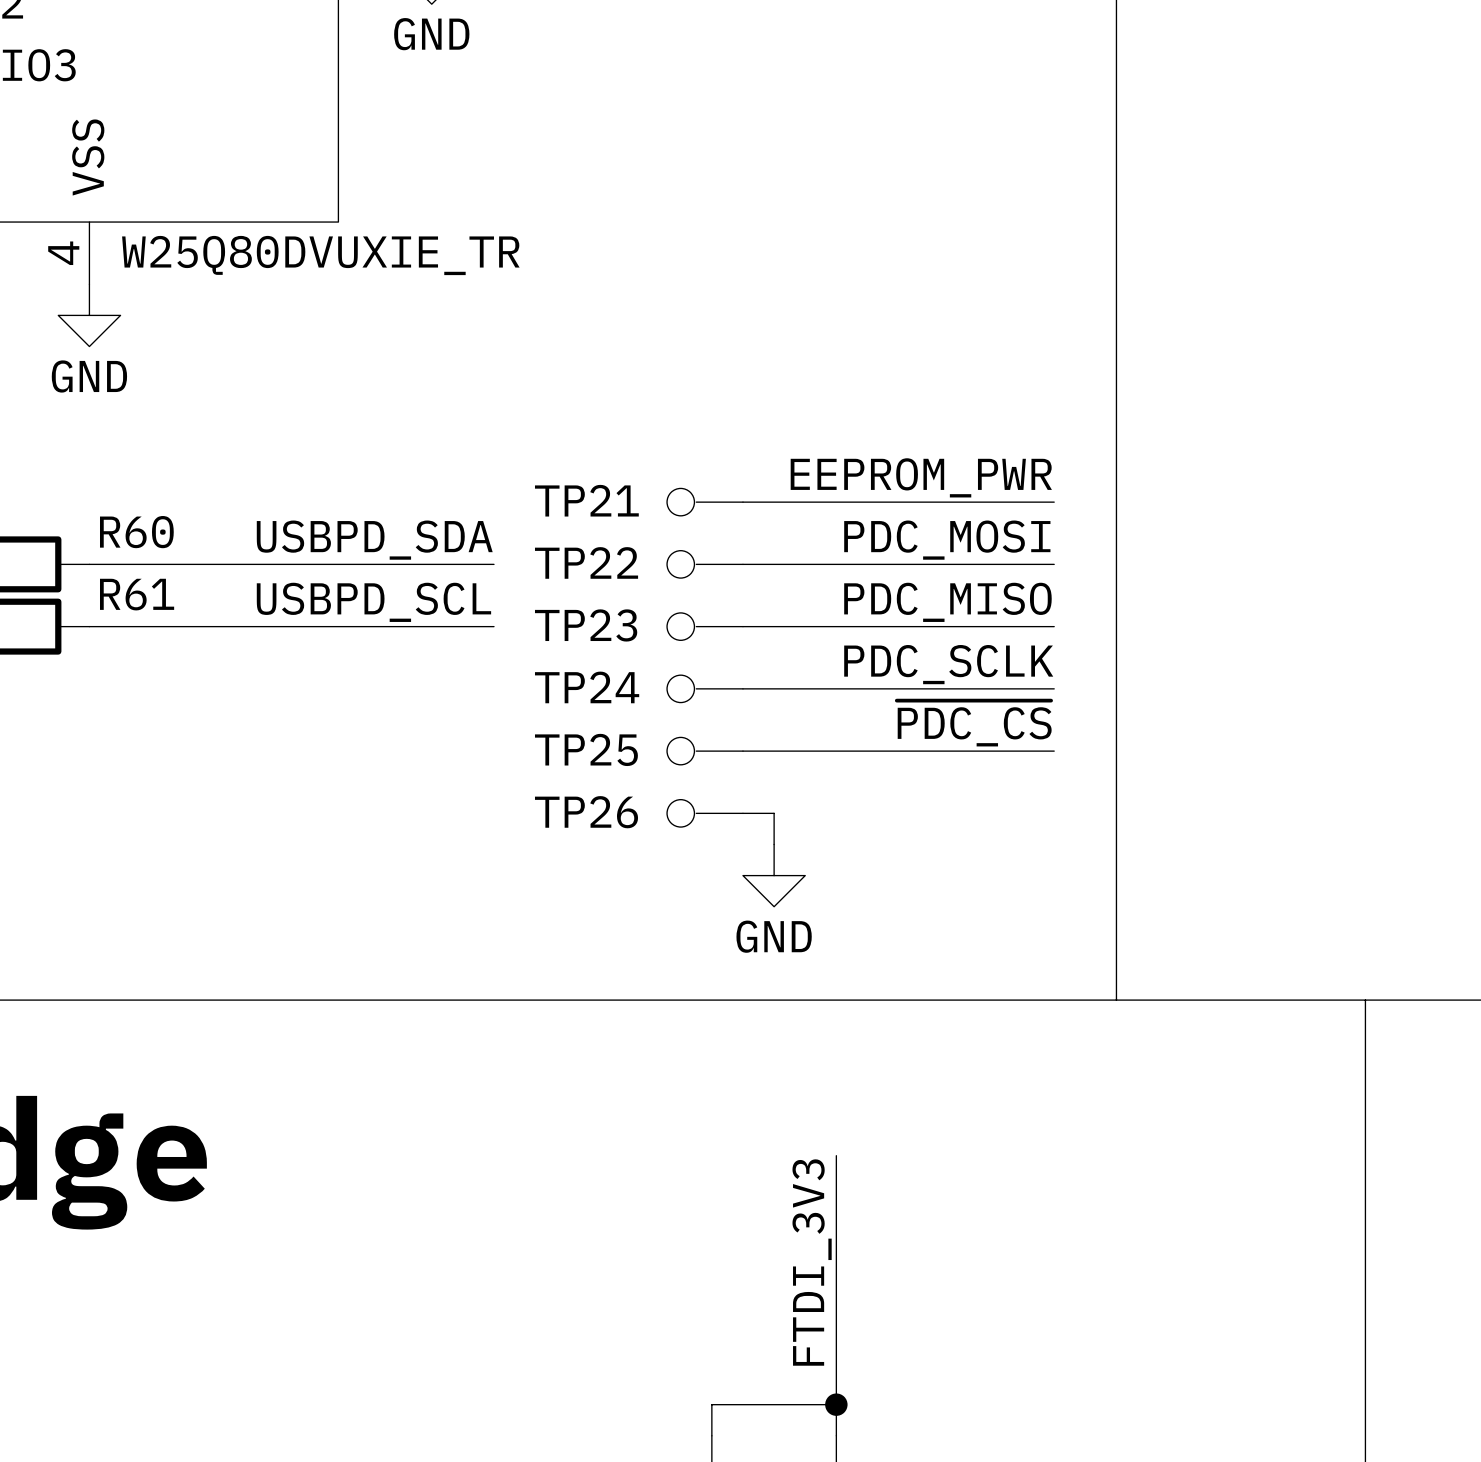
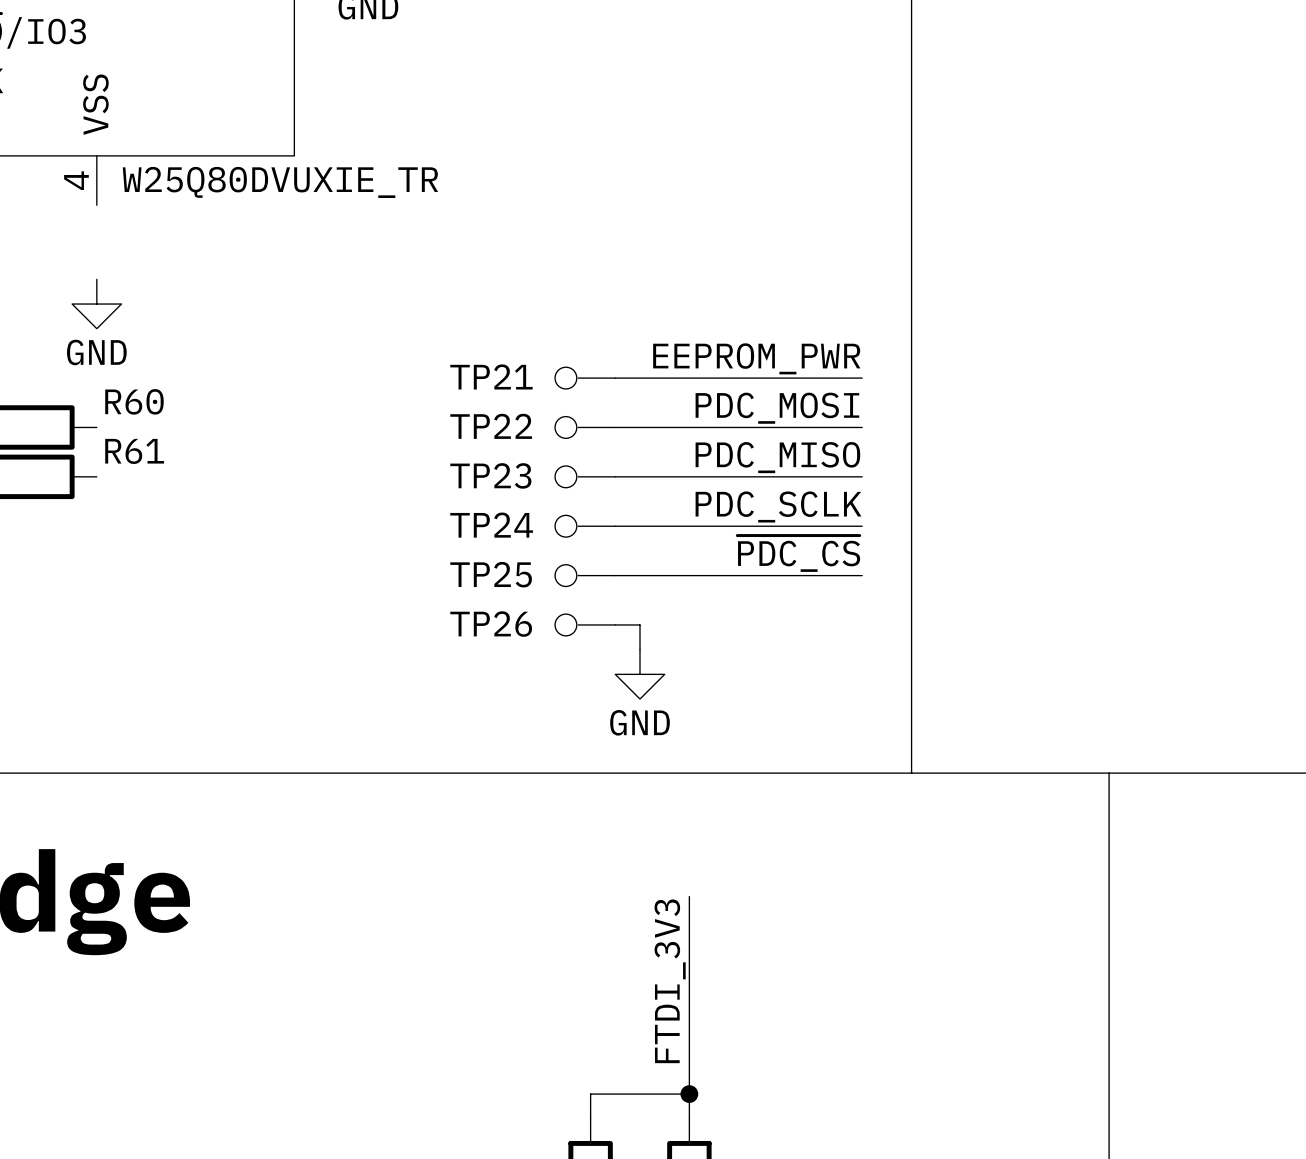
power symbol position: GND (89, 315) -> GND (96, 304)
label: USBPD_SDA (374, 540) -> none
wire: (89, 564) (494, 564) -> none
label: USBPD_SCL (373, 602) -> none
wire: (89, 626) (494, 626) -> none

